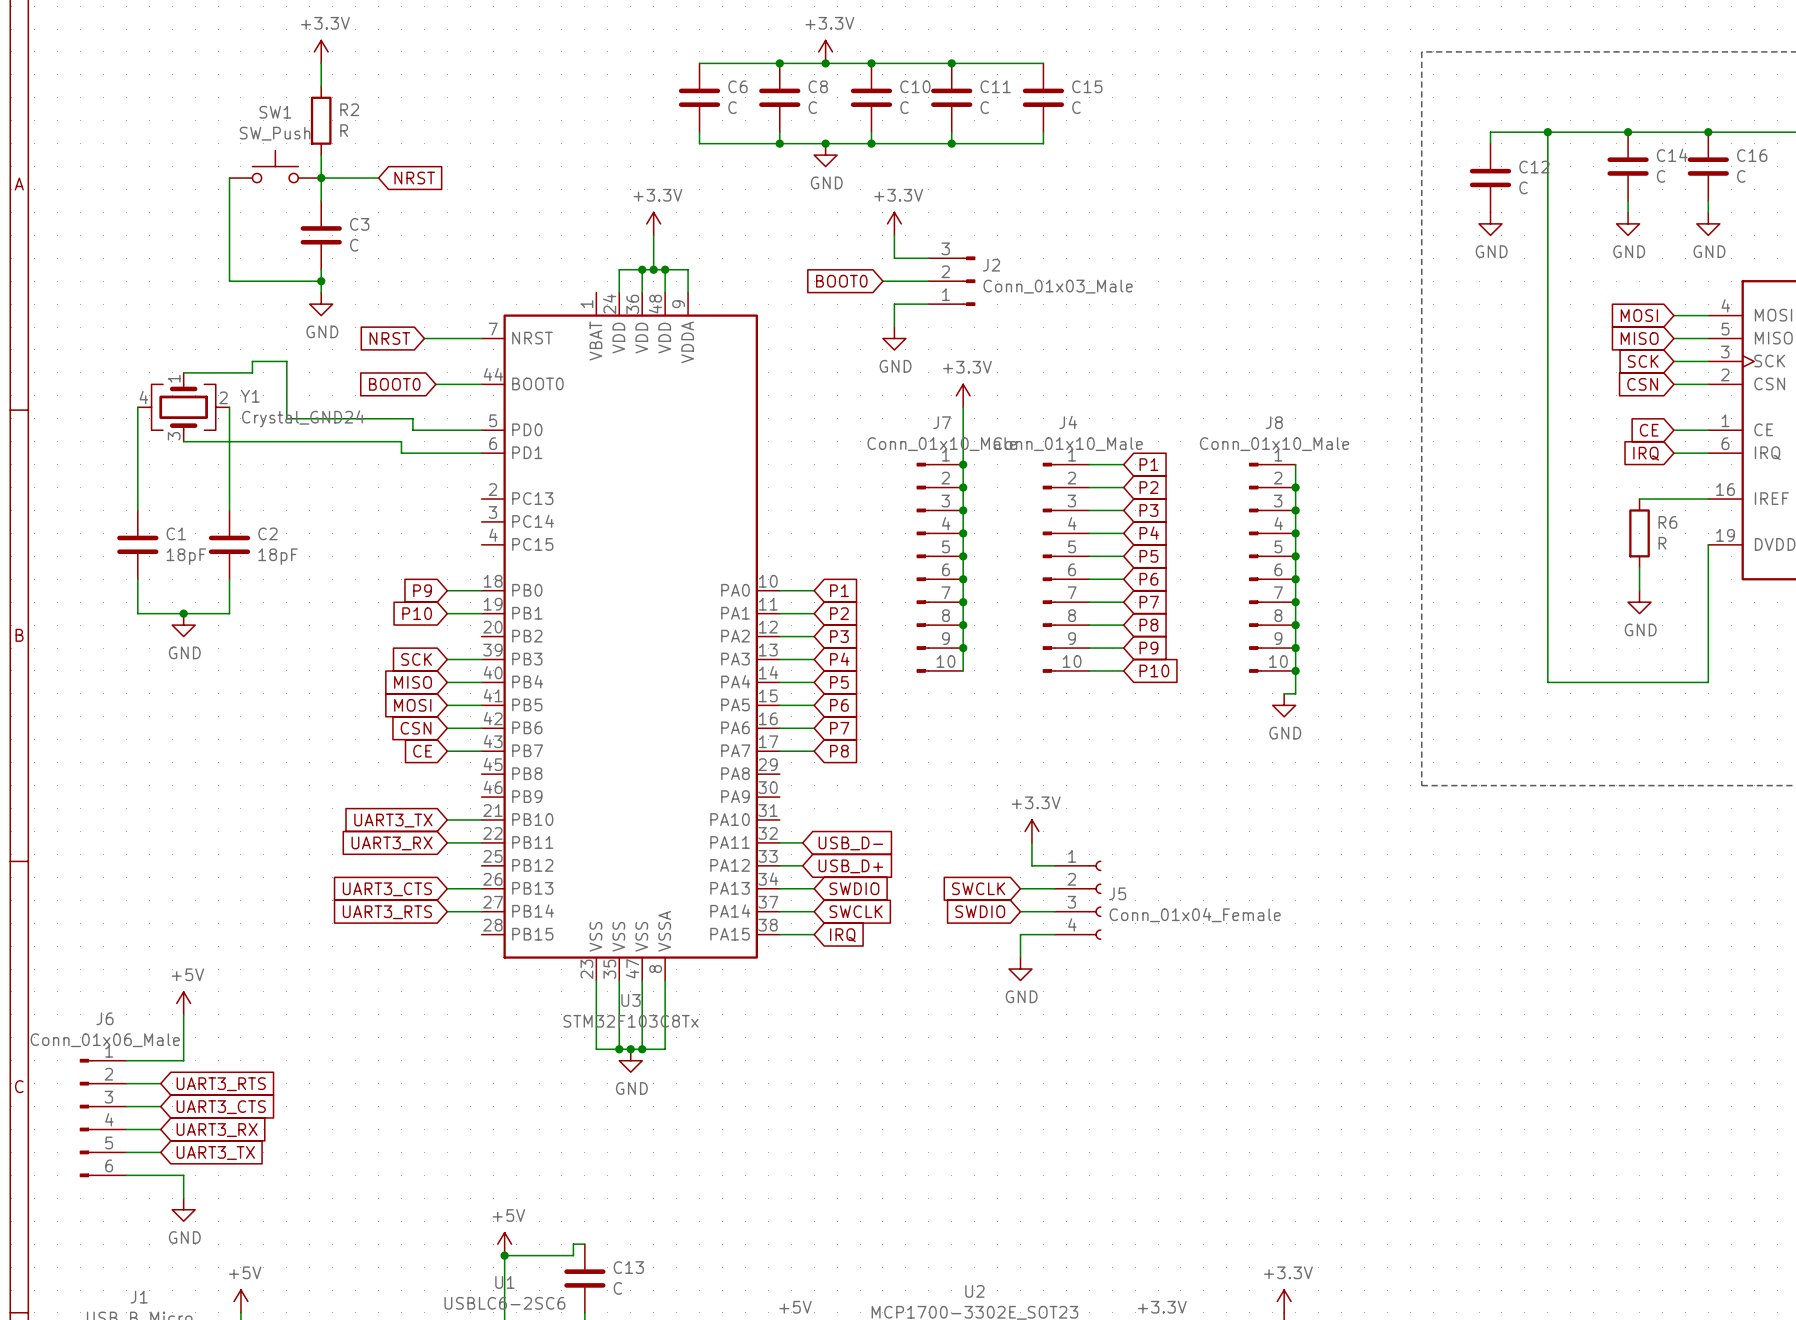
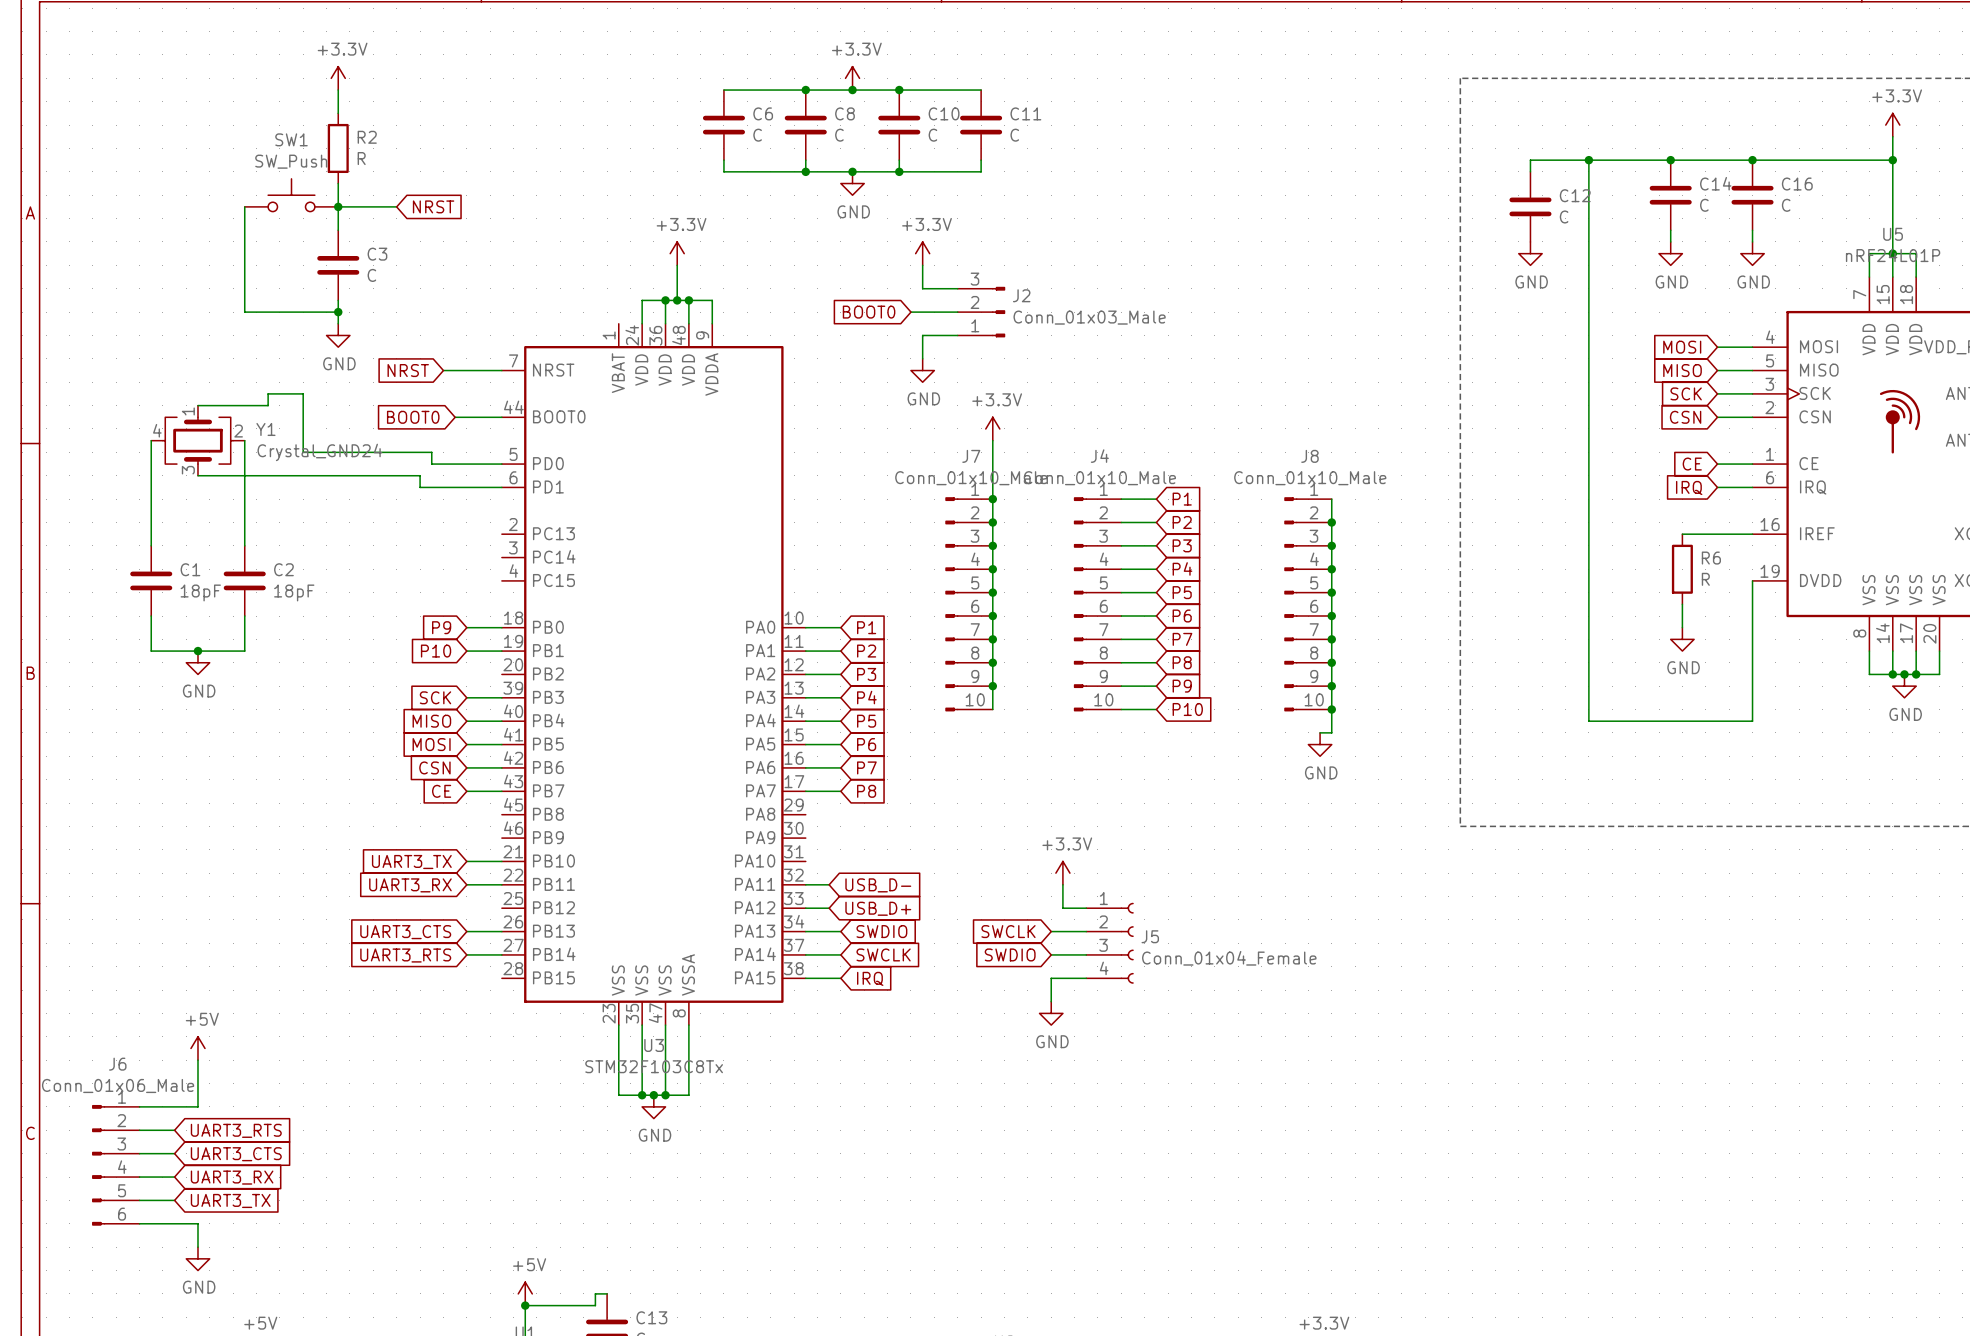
wire: (951, 63) (1043, 63) -> none
junction: (951, 63) -> none
C15: C (1043, 97) -> none
wire: (1043, 132) (1043, 143) (951, 143) -> none
junction: (951, 143) -> none

